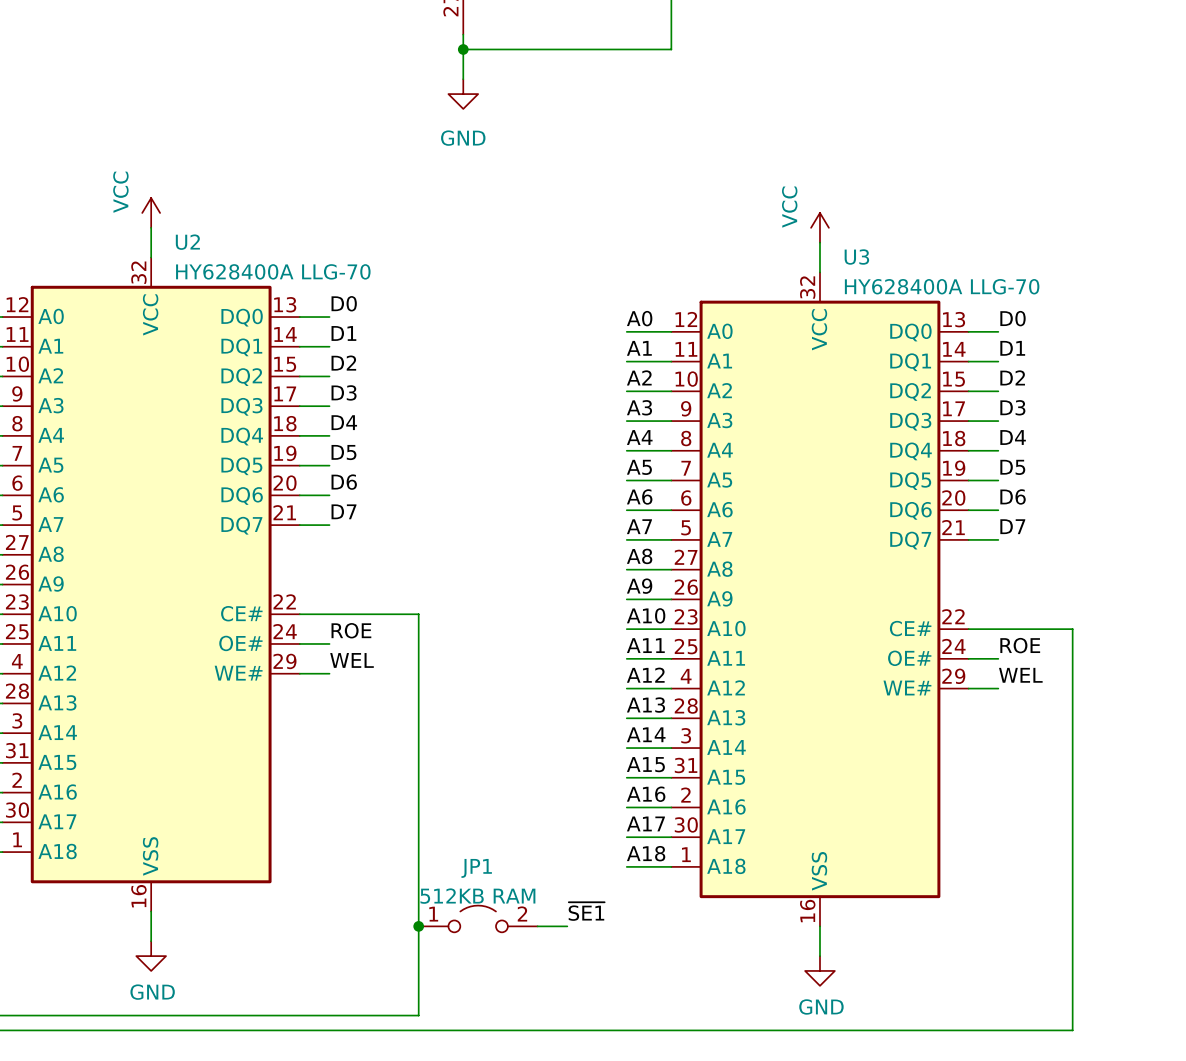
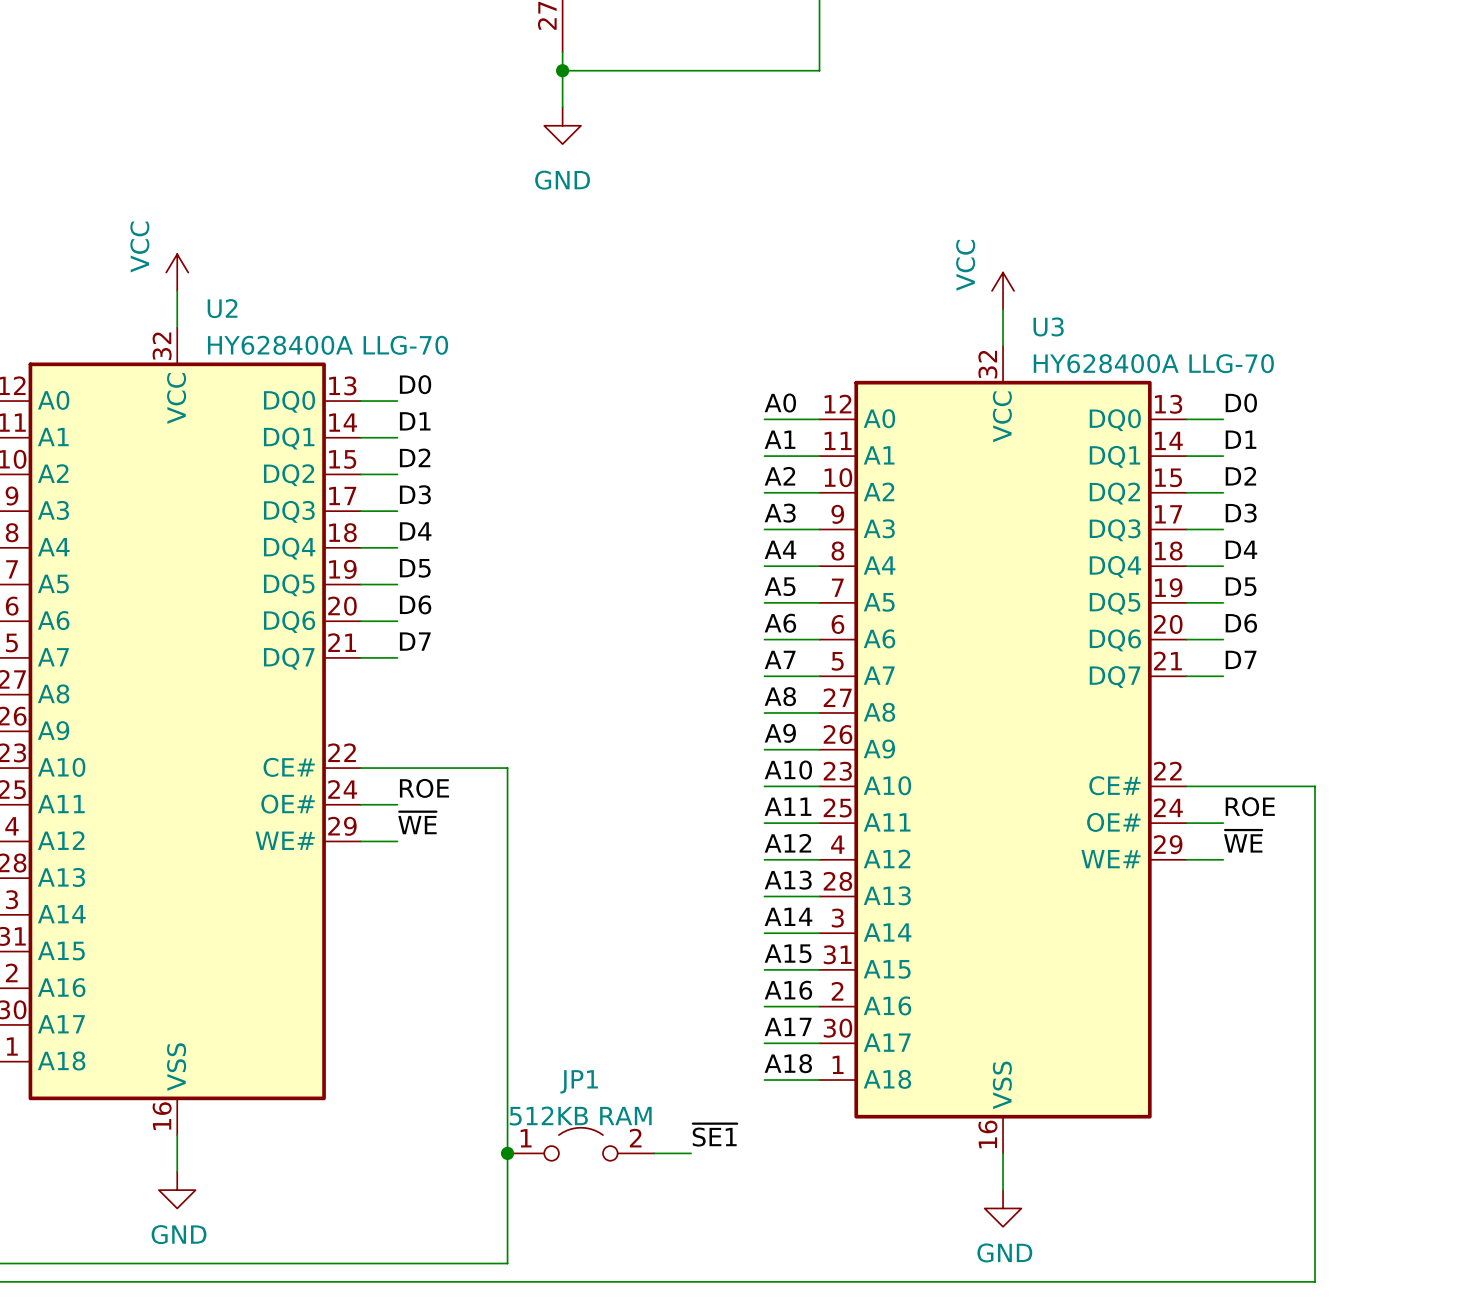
label: WEL (352, 660) -> ~{WE} (417, 822)
label: WEL (1020, 675) -> ~{WE} (1243, 841)

